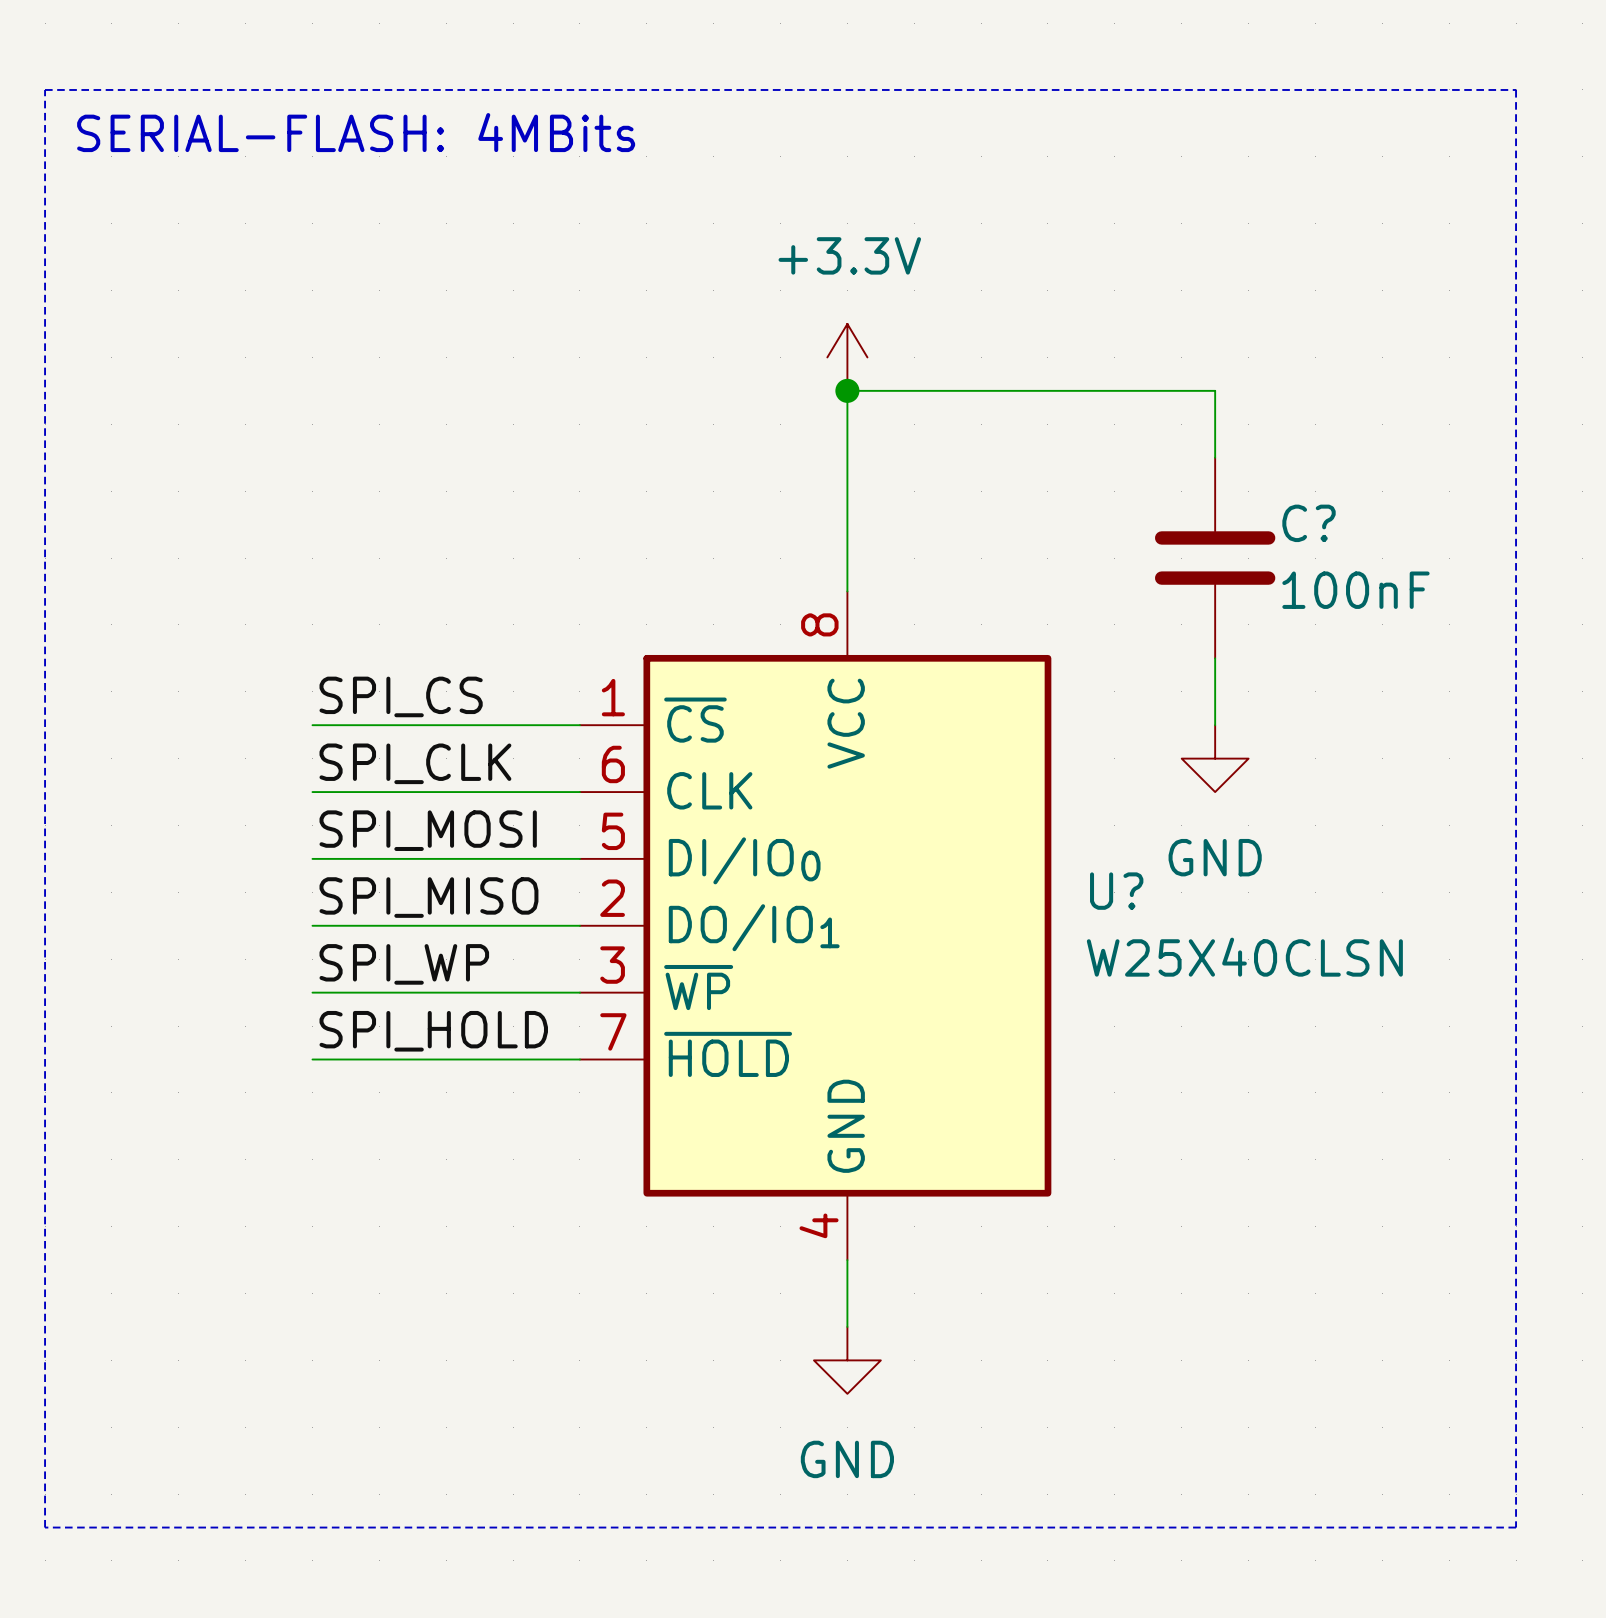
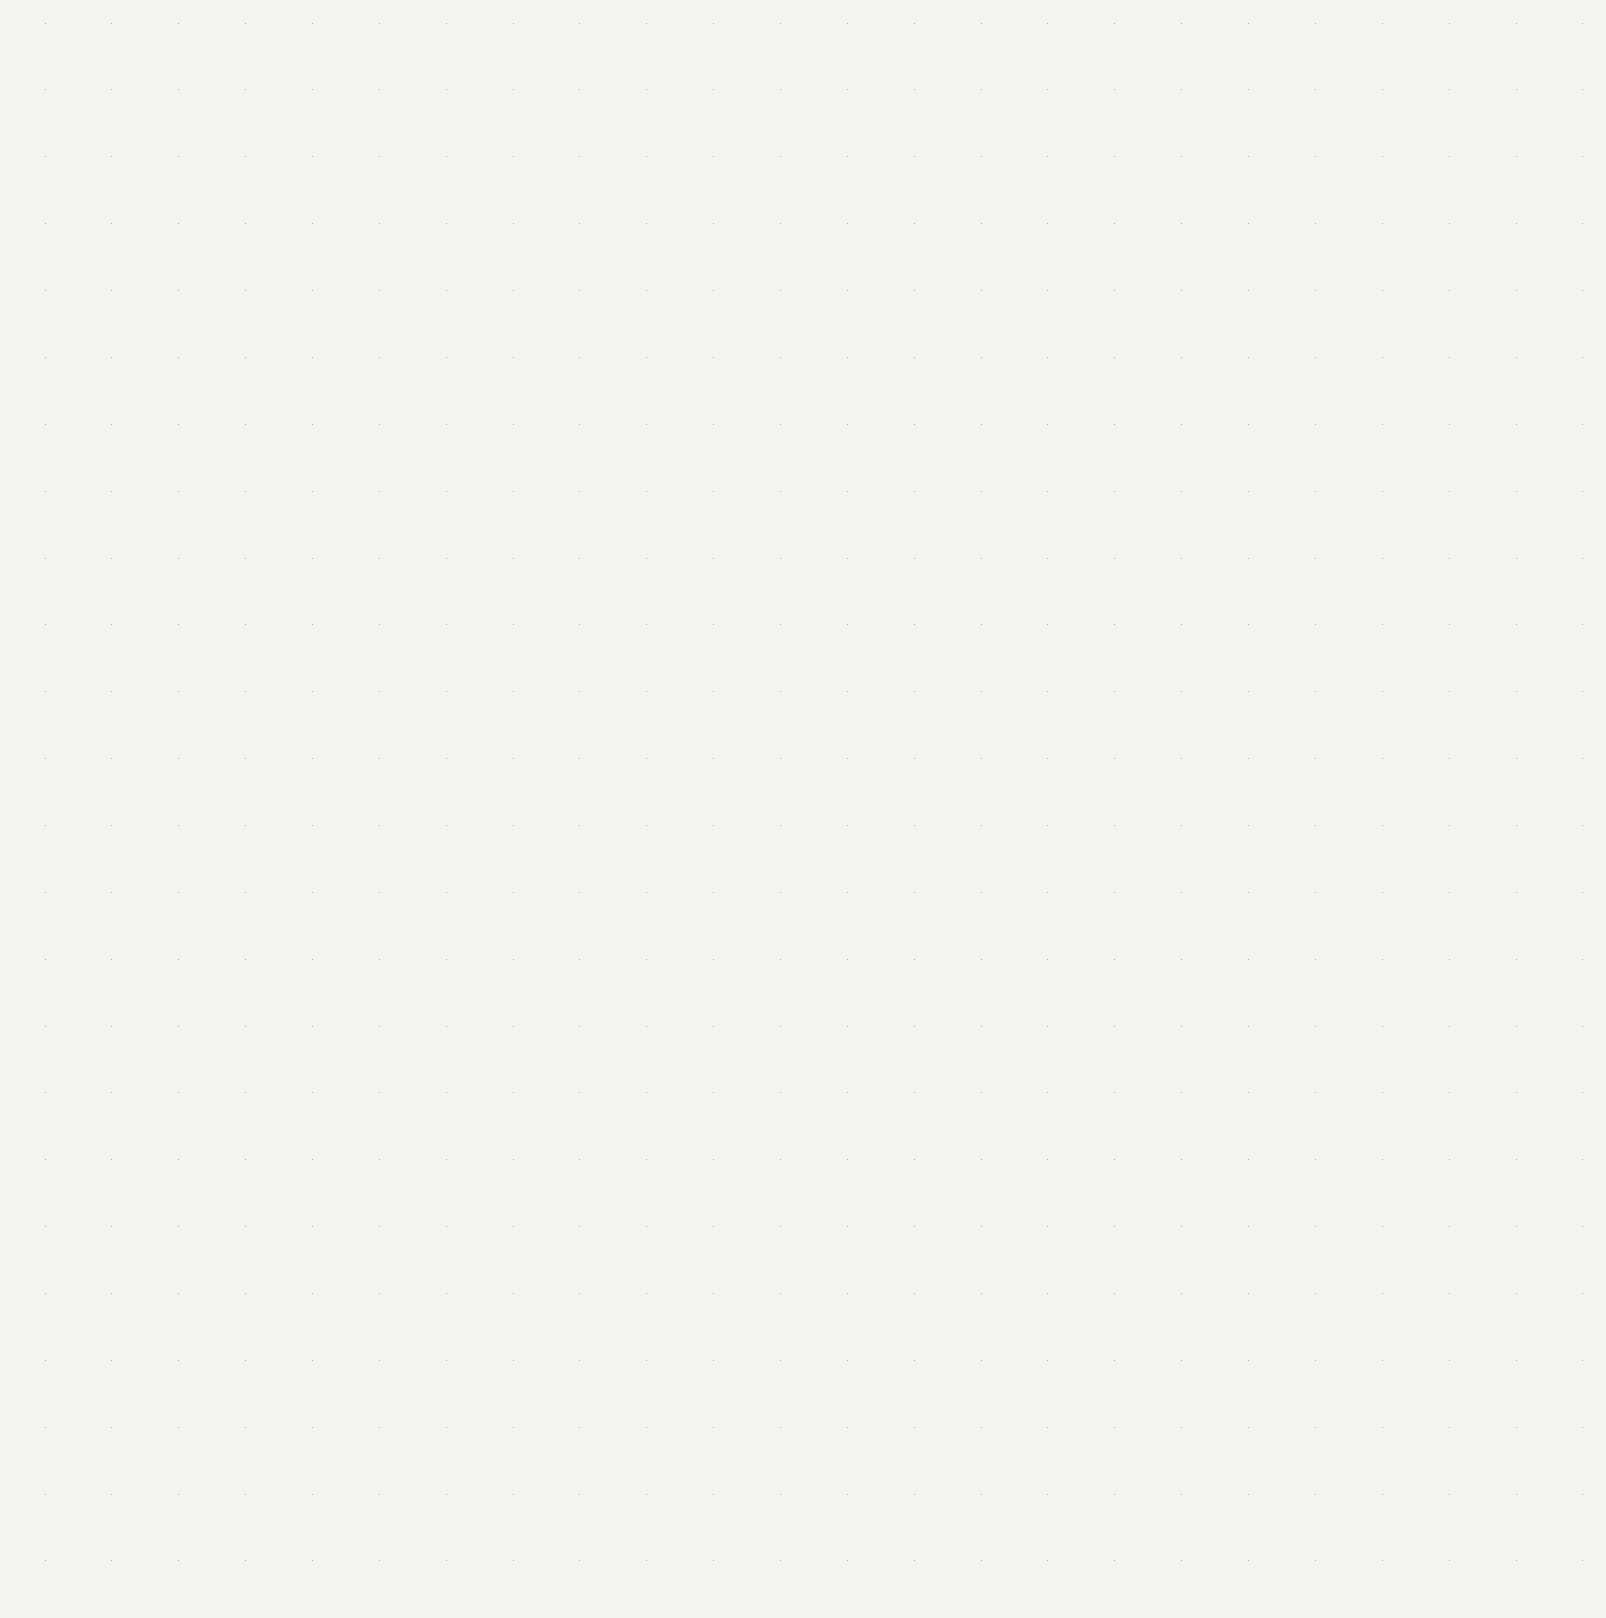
line: (45, 89) (1516, 89) (1516, 1527) (45, 1527) (45, 89) -> none
text: SERIAL-FLASH: 4MBits (356, 132) -> none
power symbol: +3.3V (847, 357) -> none
junction: (847, 390) -> none
wire: (1215, 457) (1215, 390) (847, 390) (847, 591) -> none
C?: 100nF (1215, 558) -> none
wire: (1215, 658) (1215, 725) -> none
label: SPI_CS (401, 696) -> none
wire: (312, 725) (579, 725) -> none
power symbol: GND (1215, 758) -> none
label: SPI_CLK (415, 763) -> none
wire: (312, 792) (579, 792) -> none
label: SPI_MOSI (428, 830) -> none
wire: (312, 858) (579, 858) -> none
label: SPI_MISO (428, 897) -> none
wire: (312, 925) (579, 925) -> none
U?: W25X40CLSN (815, 925) -> none
label: SPI_WP (404, 964) -> none
wire: (312, 992) (579, 992) -> none
label: SPI_HOLD (433, 1031) -> none
wire: (312, 1059) (579, 1059) -> none
wire: (847, 1260) (847, 1326) -> none
power symbol: GND (847, 1360) -> none

